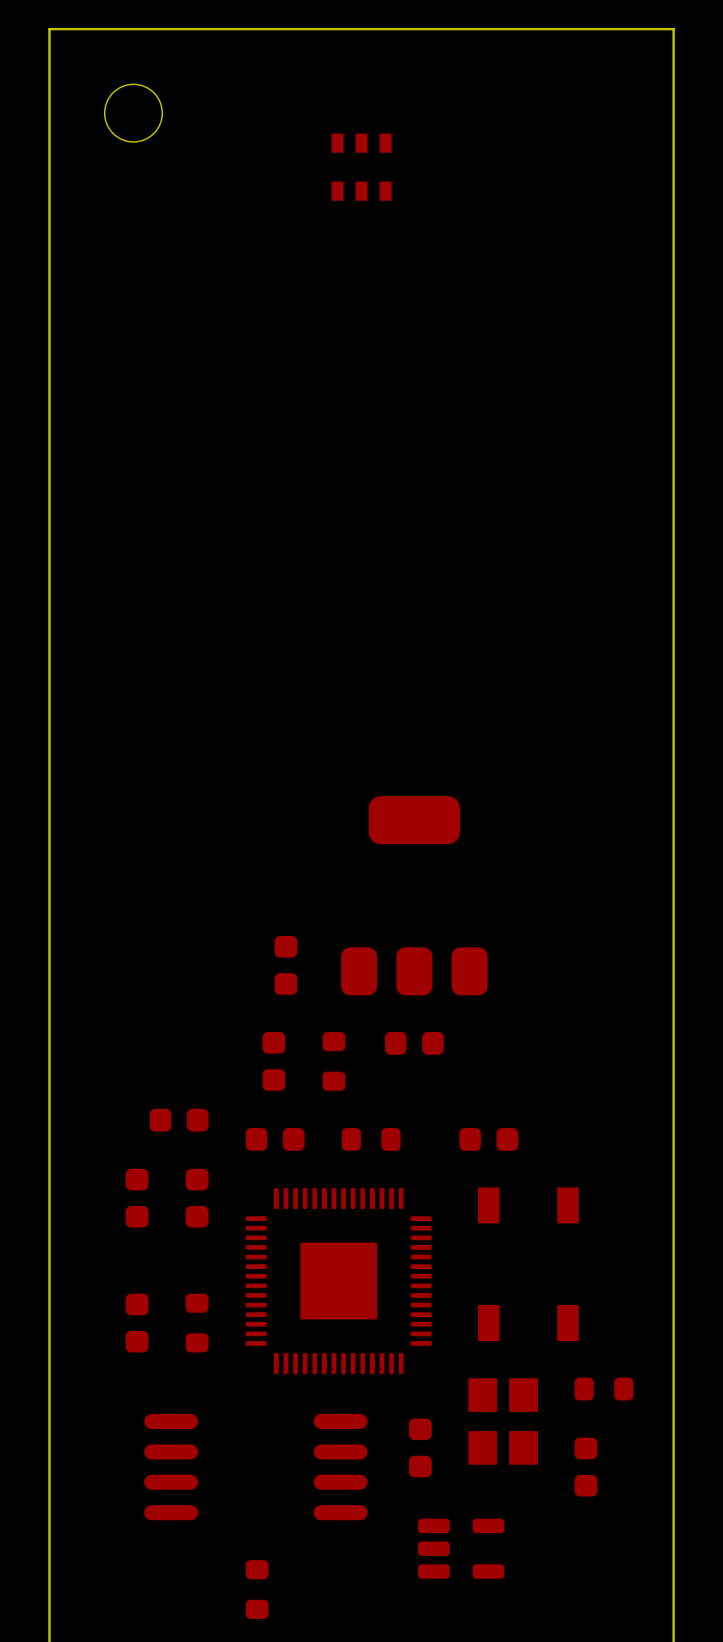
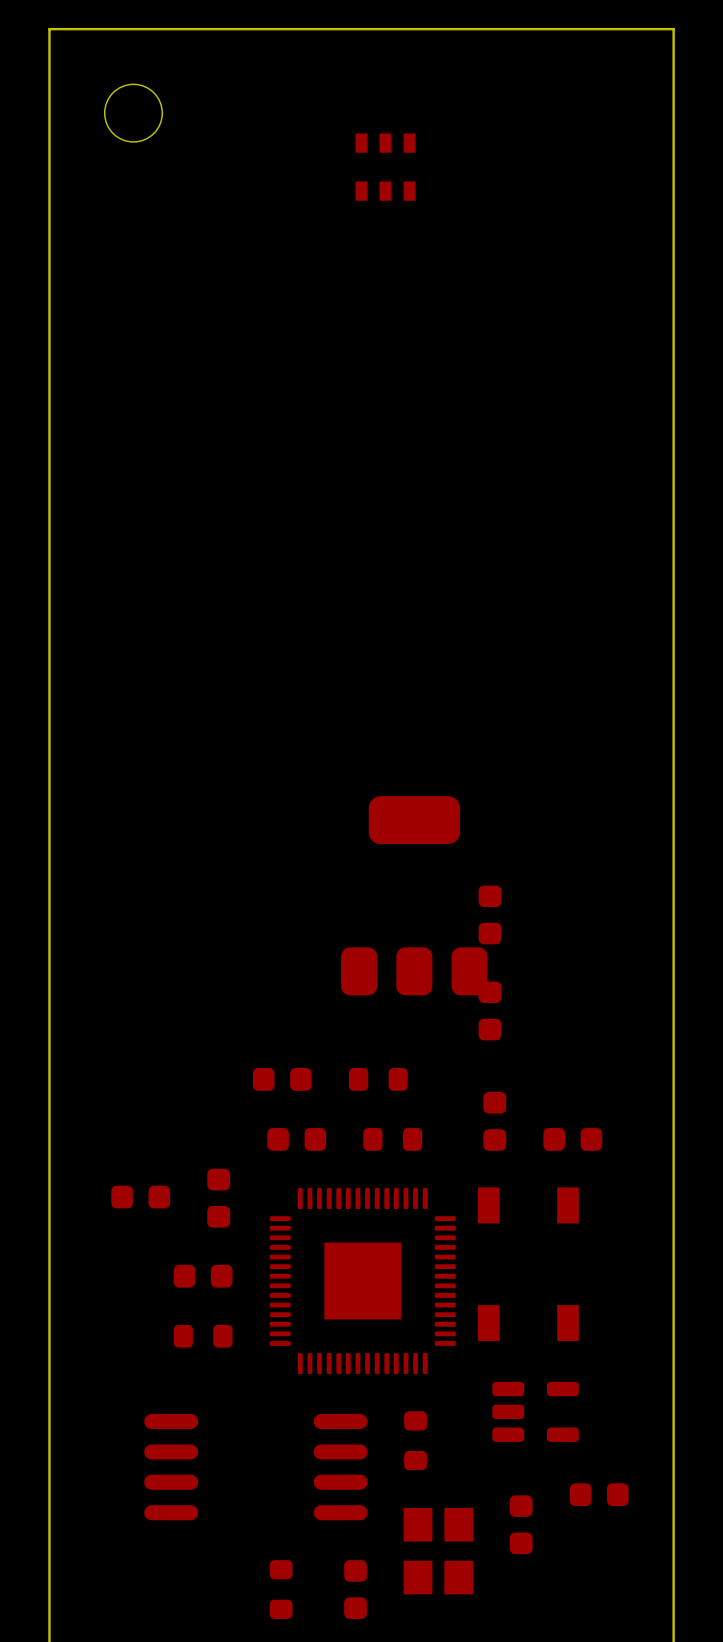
part position: (361, 167) -> (385, 167)
part: none -> (489, 914)
part: (285, 965) -> none
part: none -> (489, 1010)
part: (414, 1043) -> none
part rotation: 0° (273, 1061) -> 90° clockwise (282, 1079)
part rotation: 0° (333, 1061) -> 90° clockwise (378, 1079)
part position: (333, 1061) -> (378, 1079)
part: (179, 1120) -> none
part position: (275, 1139) -> (296, 1139)
part position: (371, 1139) -> (392, 1139)
part rotation: 0° (488, 1139) -> 90° clockwise (494, 1121)
part: none -> (572, 1139)
part rotation: 0° (137, 1198) -> 90° clockwise (140, 1197)
part position: (197, 1198) -> (218, 1198)
part: none -> (203, 1276)
part position: (338, 1281) -> (362, 1281)
part: (137, 1323) -> none
part rotation: 0° (197, 1323) -> 90° clockwise (203, 1336)
part: (604, 1389) -> none
part: none -> (535, 1411)
part footprint: [408, 1418, 432, 1478] -> [404, 1411, 427, 1471]
part: (503, 1421) -> none
part rotation: 0° (586, 1467) -> 90° clockwise (599, 1494)
part footprint: [417, 1518, 505, 1579] -> [403, 1507, 474, 1595]
part: none -> (521, 1524)
part position: (257, 1589) -> (281, 1589)
part: none -> (355, 1589)

